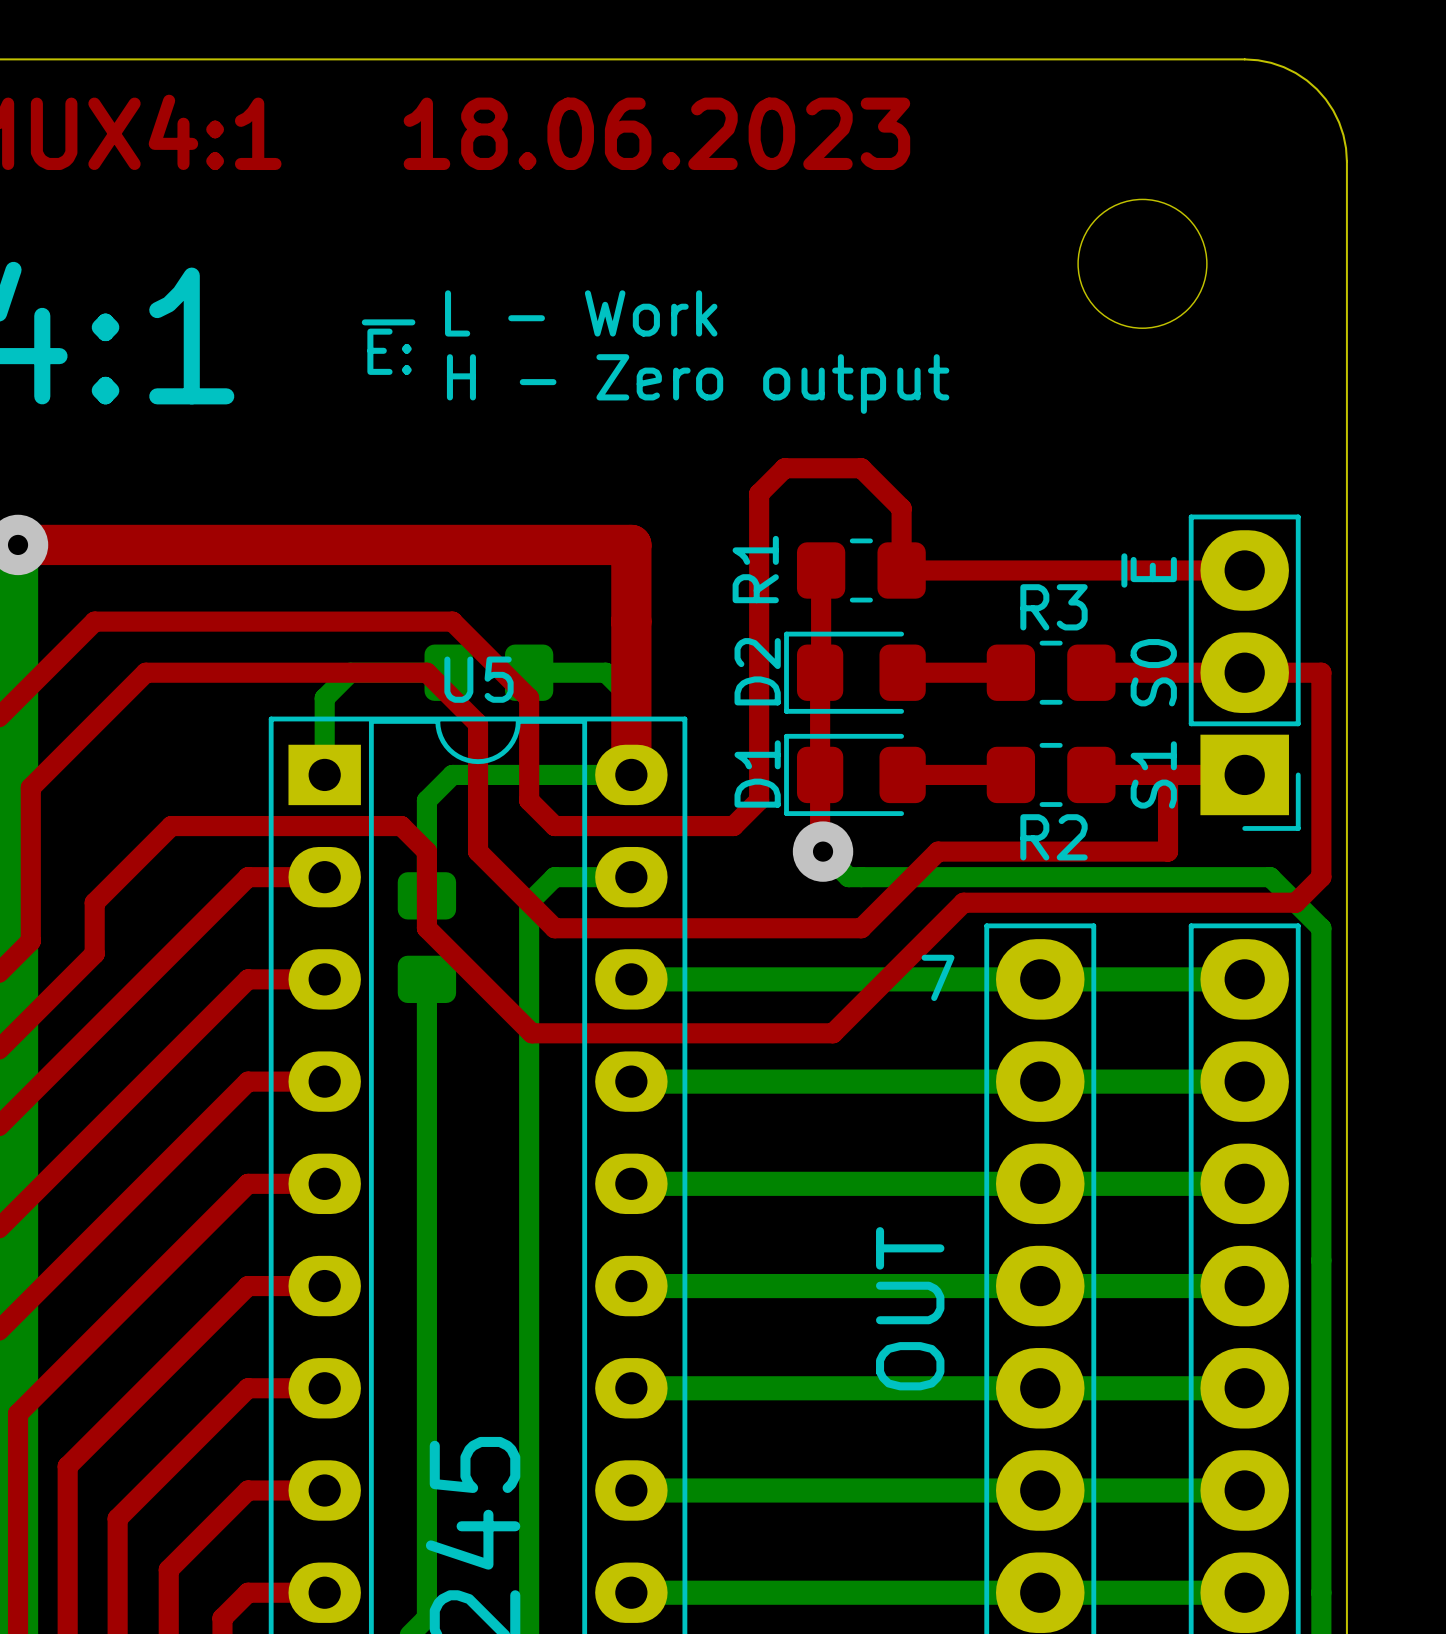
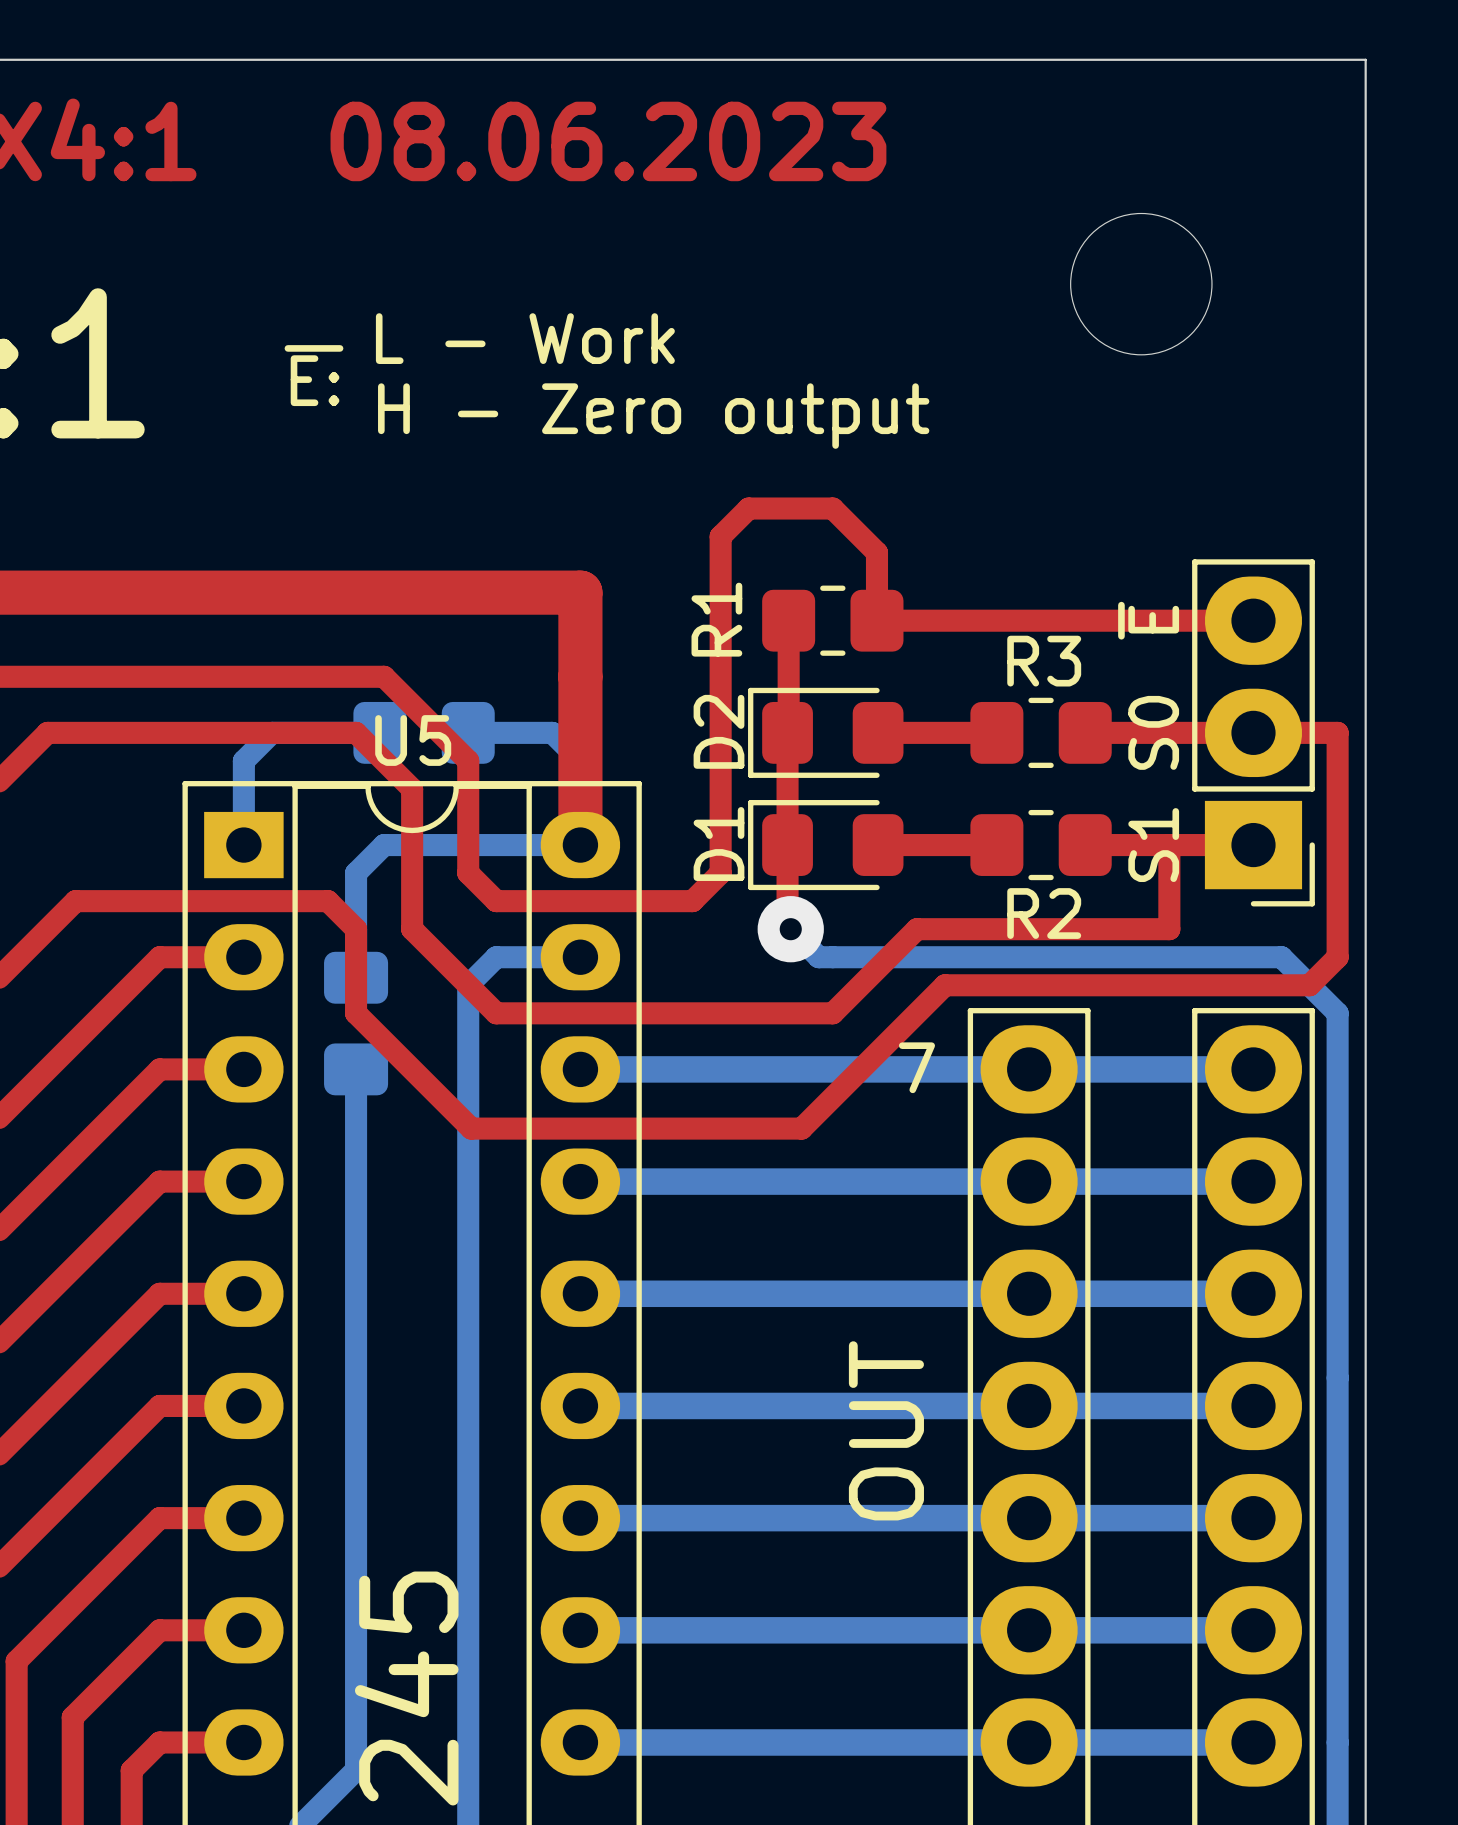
board edge: (1244, 59) (1271, 62) (1283, 67) (1295, 73) (1316, 89) (1333, 110) (1339, 122) (1346, 148) (1346, 161) -> (1253, 59) (1365, 59) (1365, 171)
text: 18.06.2023 (656, 133) -> 08.06.2023 (608, 141)

